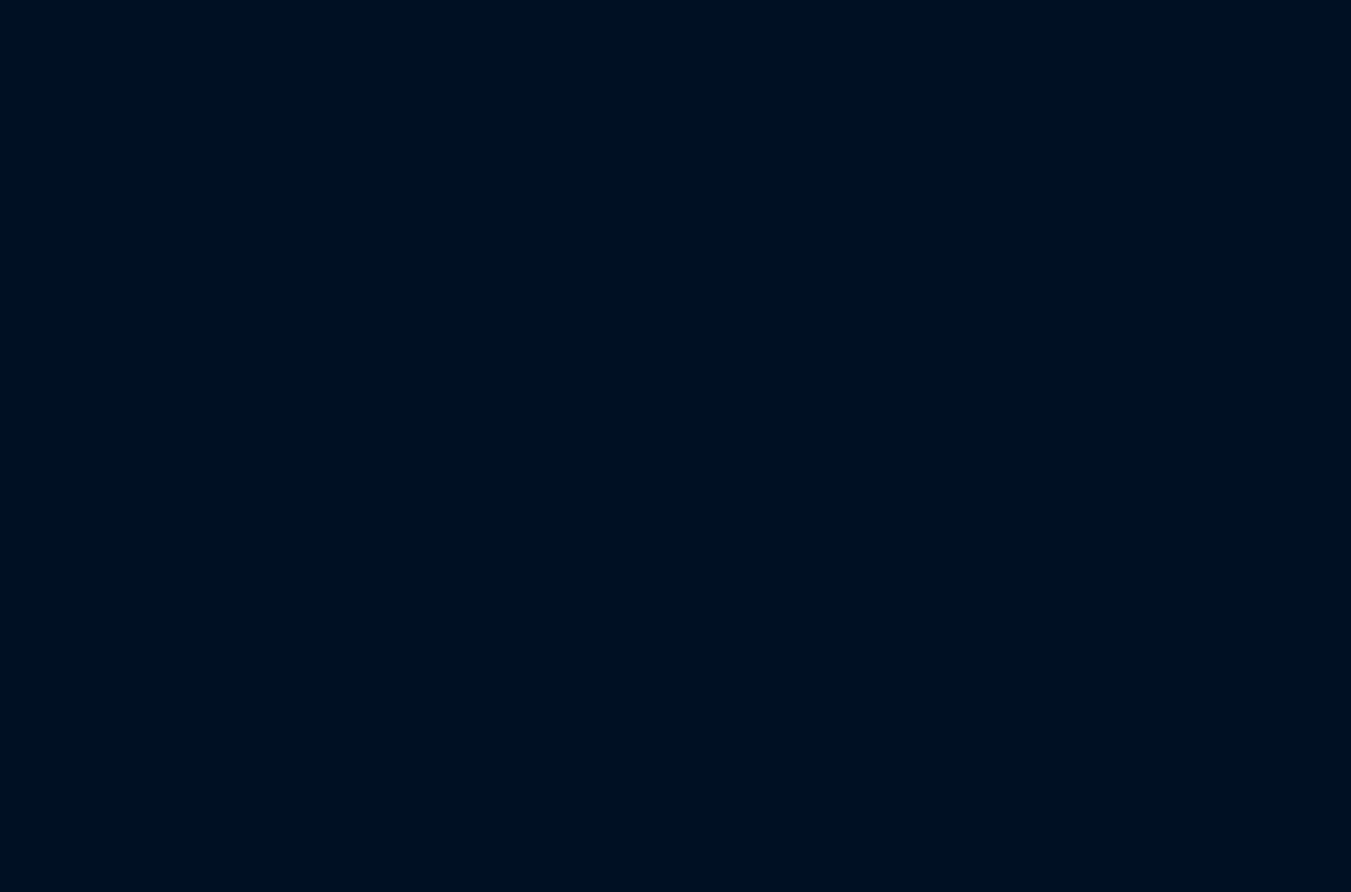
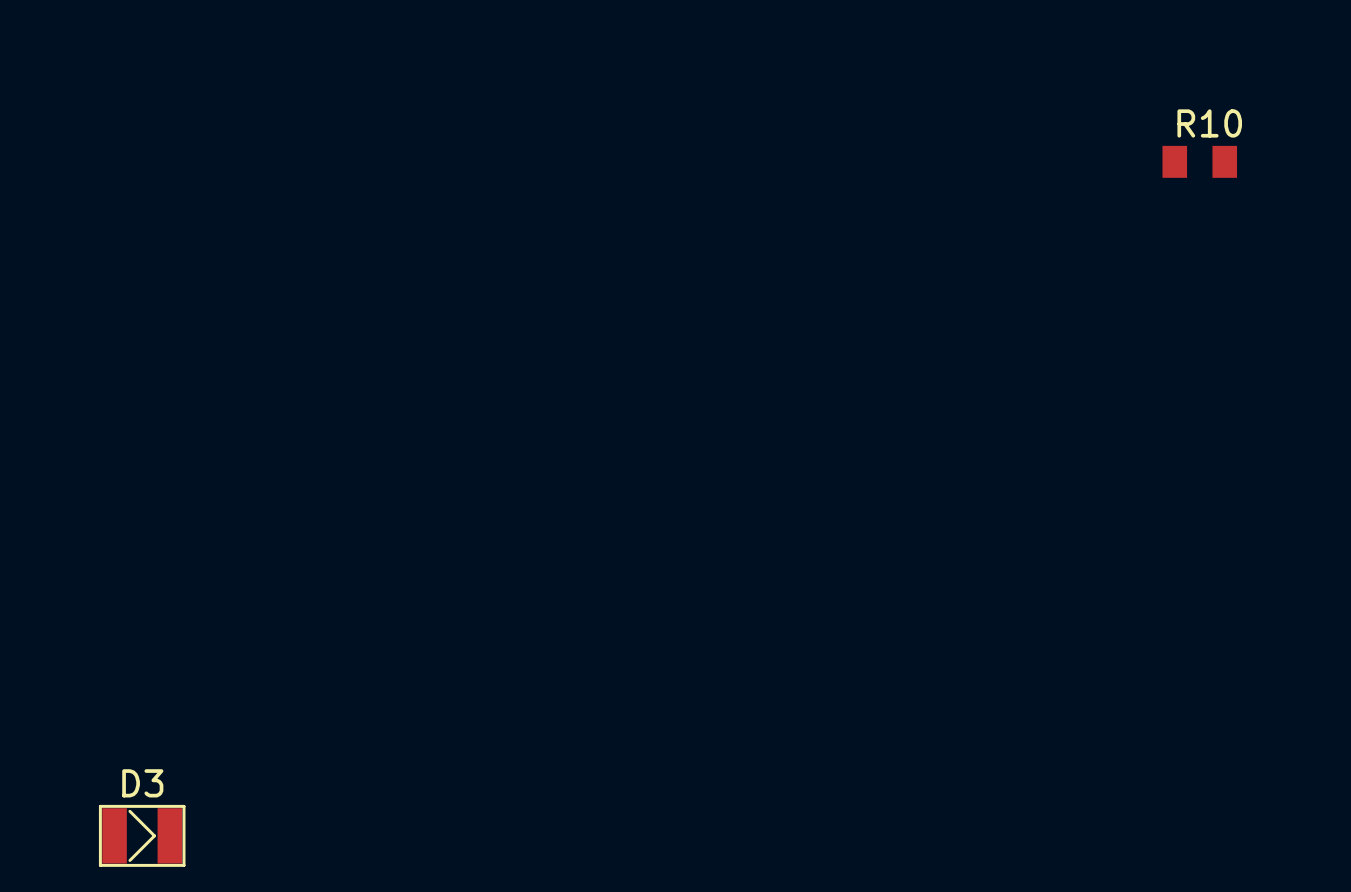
R10: none -> (1199, 161)
D3: none -> (142, 835)

